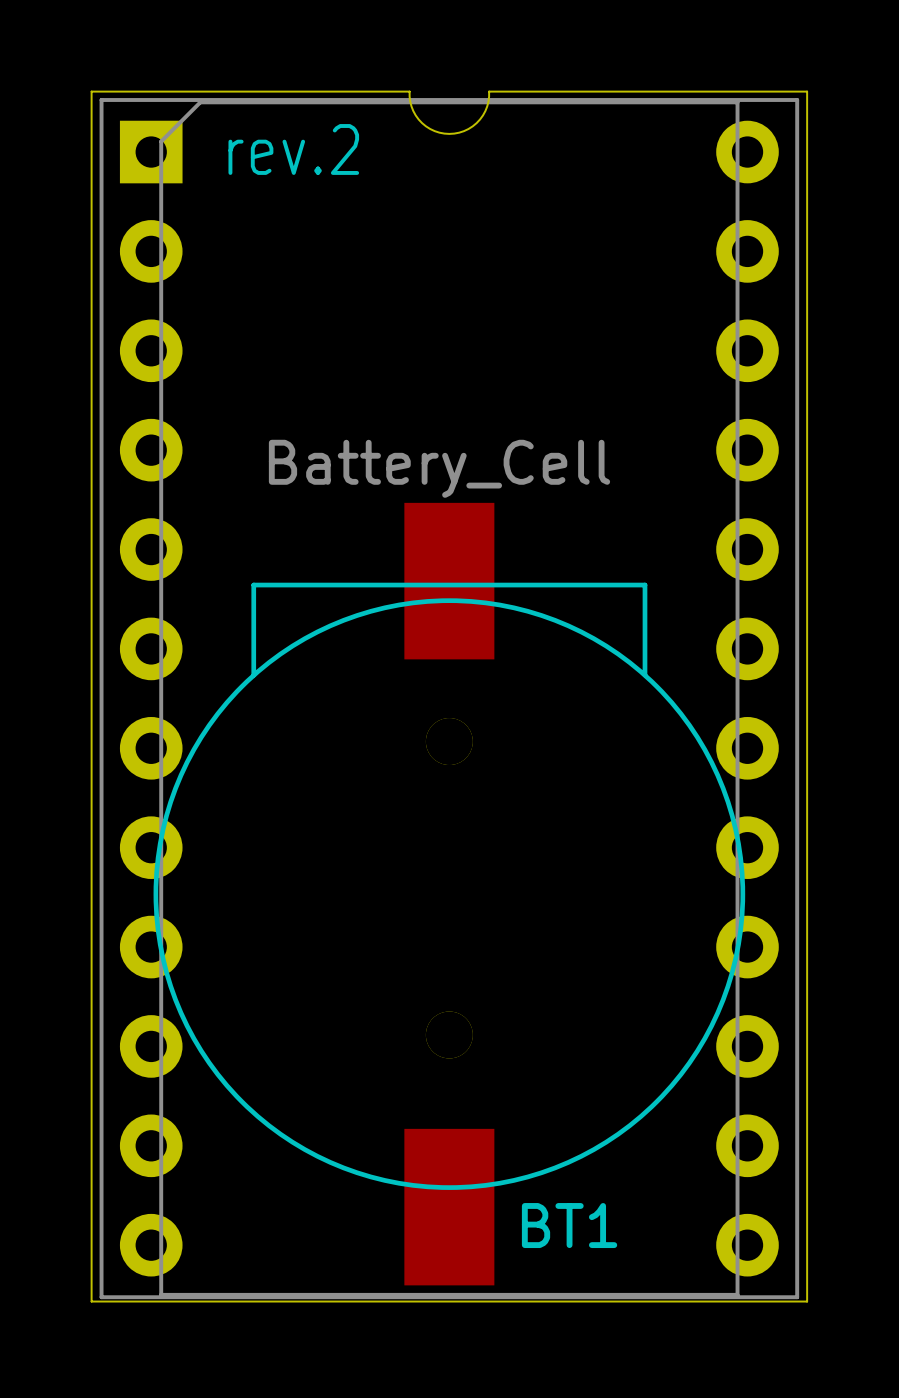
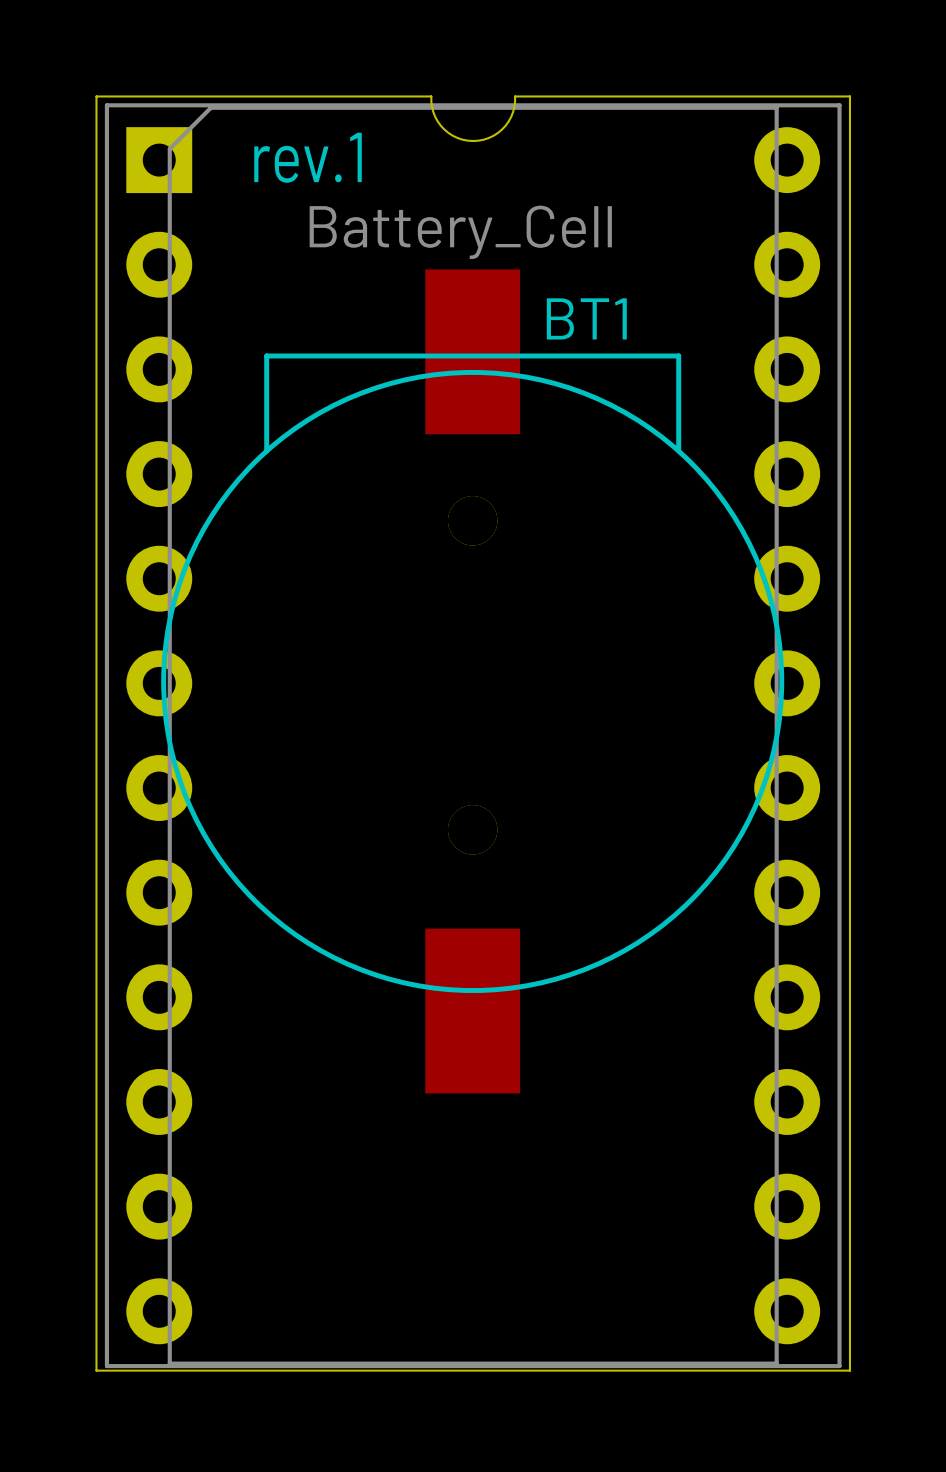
text: rev.2 (293, 149) -> rev.1 (308, 157)
BT1 position: (449, 894) -> (472, 681)
BT1 name position: BT1 (569, 1225) -> BT1 (586, 318)

